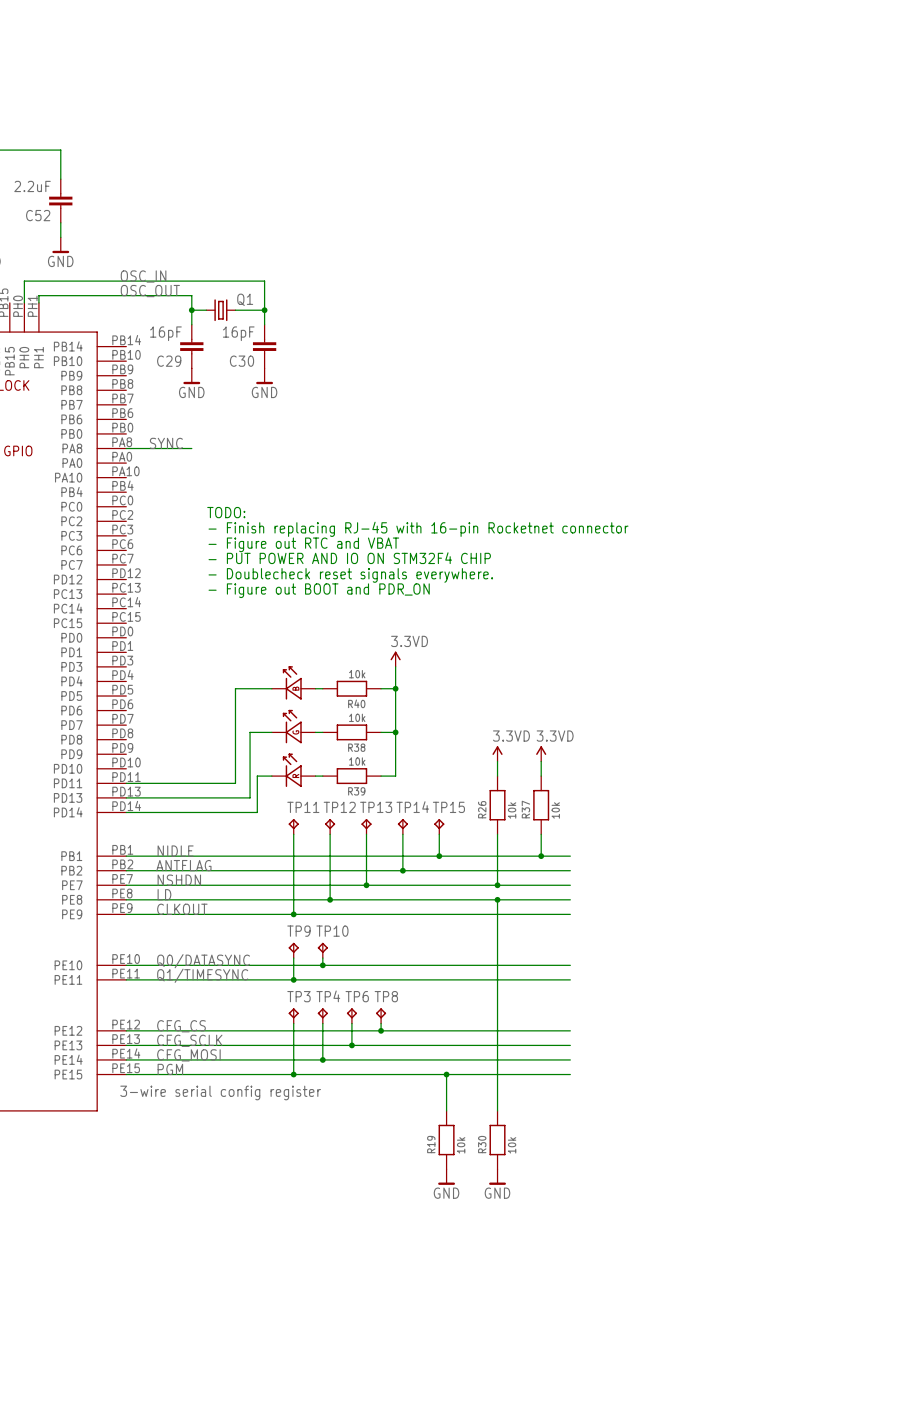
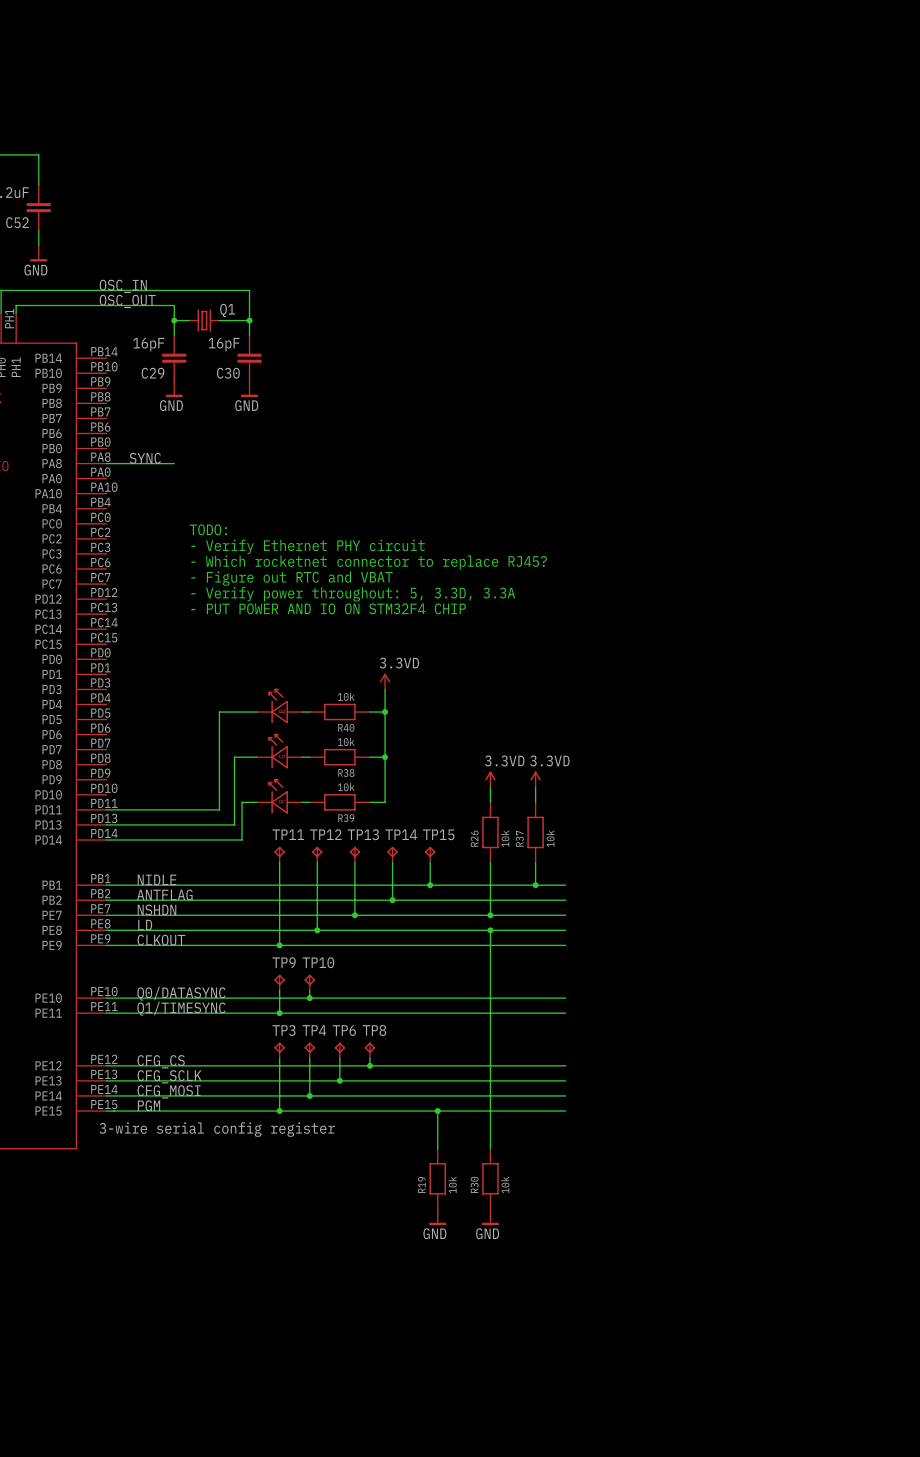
text: - Finish replacing RJ-45 with 16-pin Rocketnet connector (418, 529) -> - Verify Ethernet PHY circuit (308, 546)
text: - Figure out RTC and VBAT (303, 544) -> - Which rocketnet connector to replace RJ45? (369, 562)
text: - PUT POWER AND IO ON STM32F4 CHIP (349, 558) -> - Figure out RTC and VBAT (292, 578)
text: - Doublecheck reset signals everywhere. (350, 575) -> - Verify power throughout: 5, 3.3D, 3.3A (353, 594)
text: - Figure out BOOT and PDR_ON (319, 590) -> - PUT POWER AND IO ON STM32F4 CHIP (328, 608)

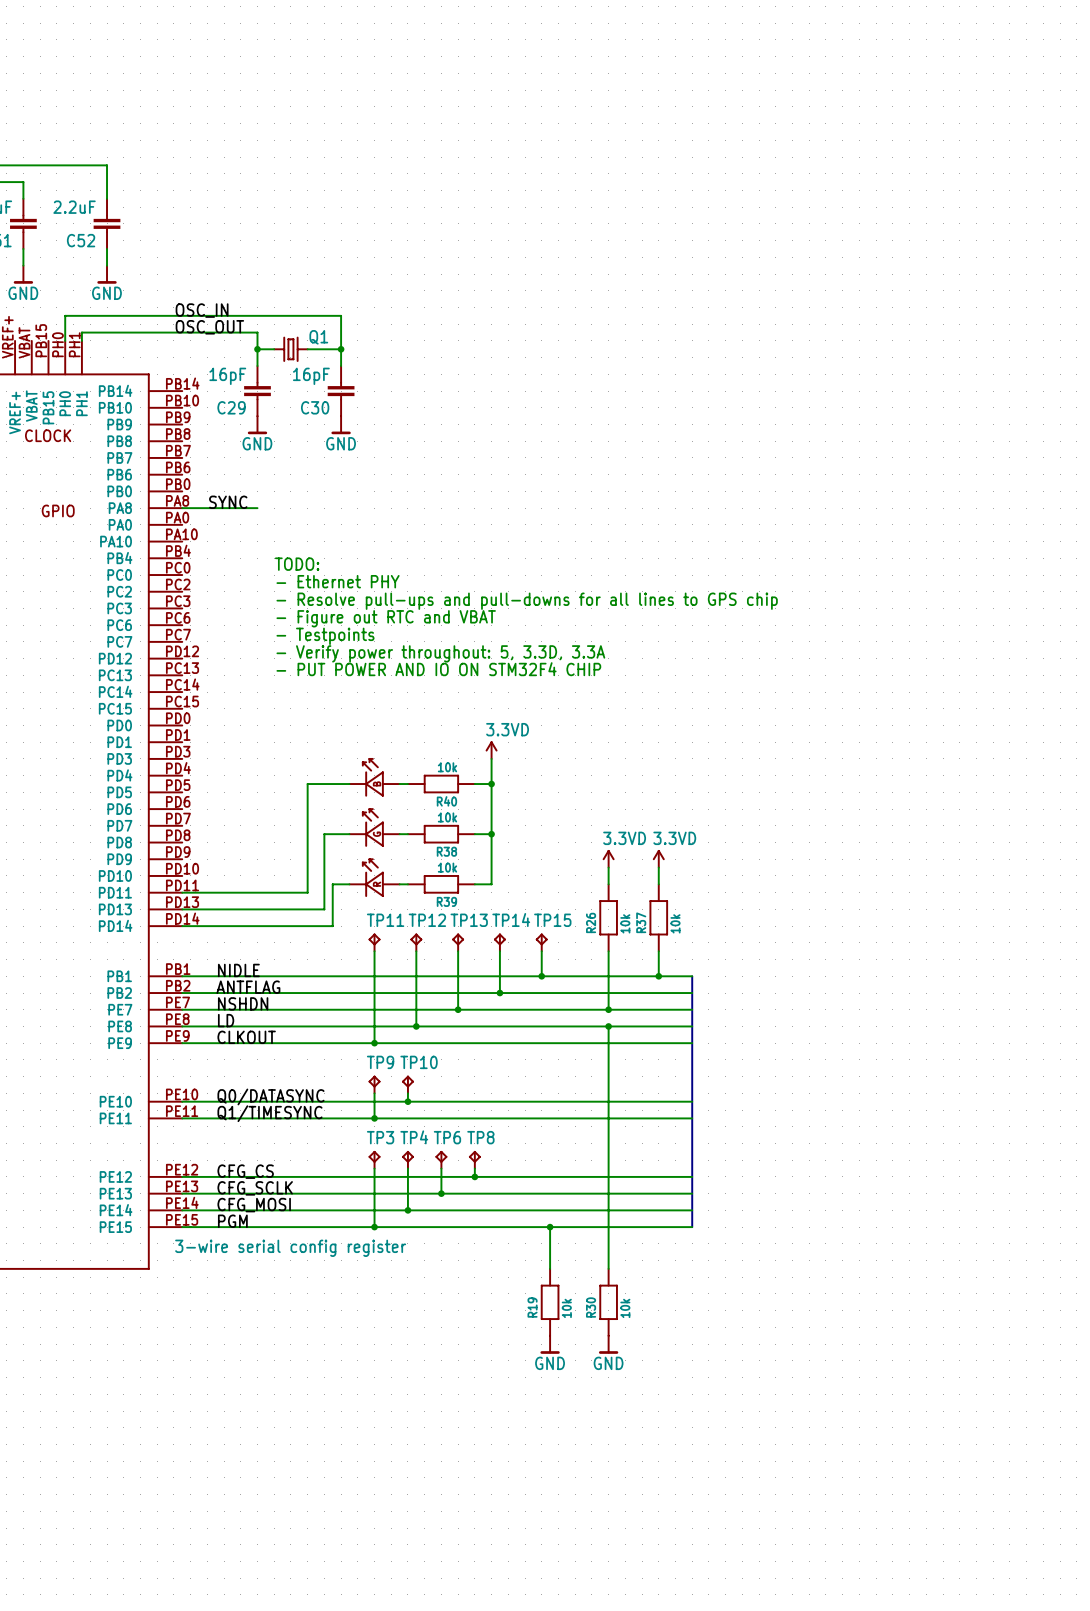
text: none -> TODO: (297, 564)
text: TODO: (208, 529) -> - Ethernet PHY (338, 581)
text: - Verify Ethernet PHY circuit (308, 546) -> - Resolve pull-ups and pull-downs for all lines to GPS chip (527, 601)
text: - Which rocketnet connector to replace RJ45? (369, 562) -> - Figure out RTC and VBAT (386, 618)
text: - Figure out RTC and VBAT (292, 578) -> - Testpoints (325, 636)
bus: none -> (692, 976) (692, 1227)

